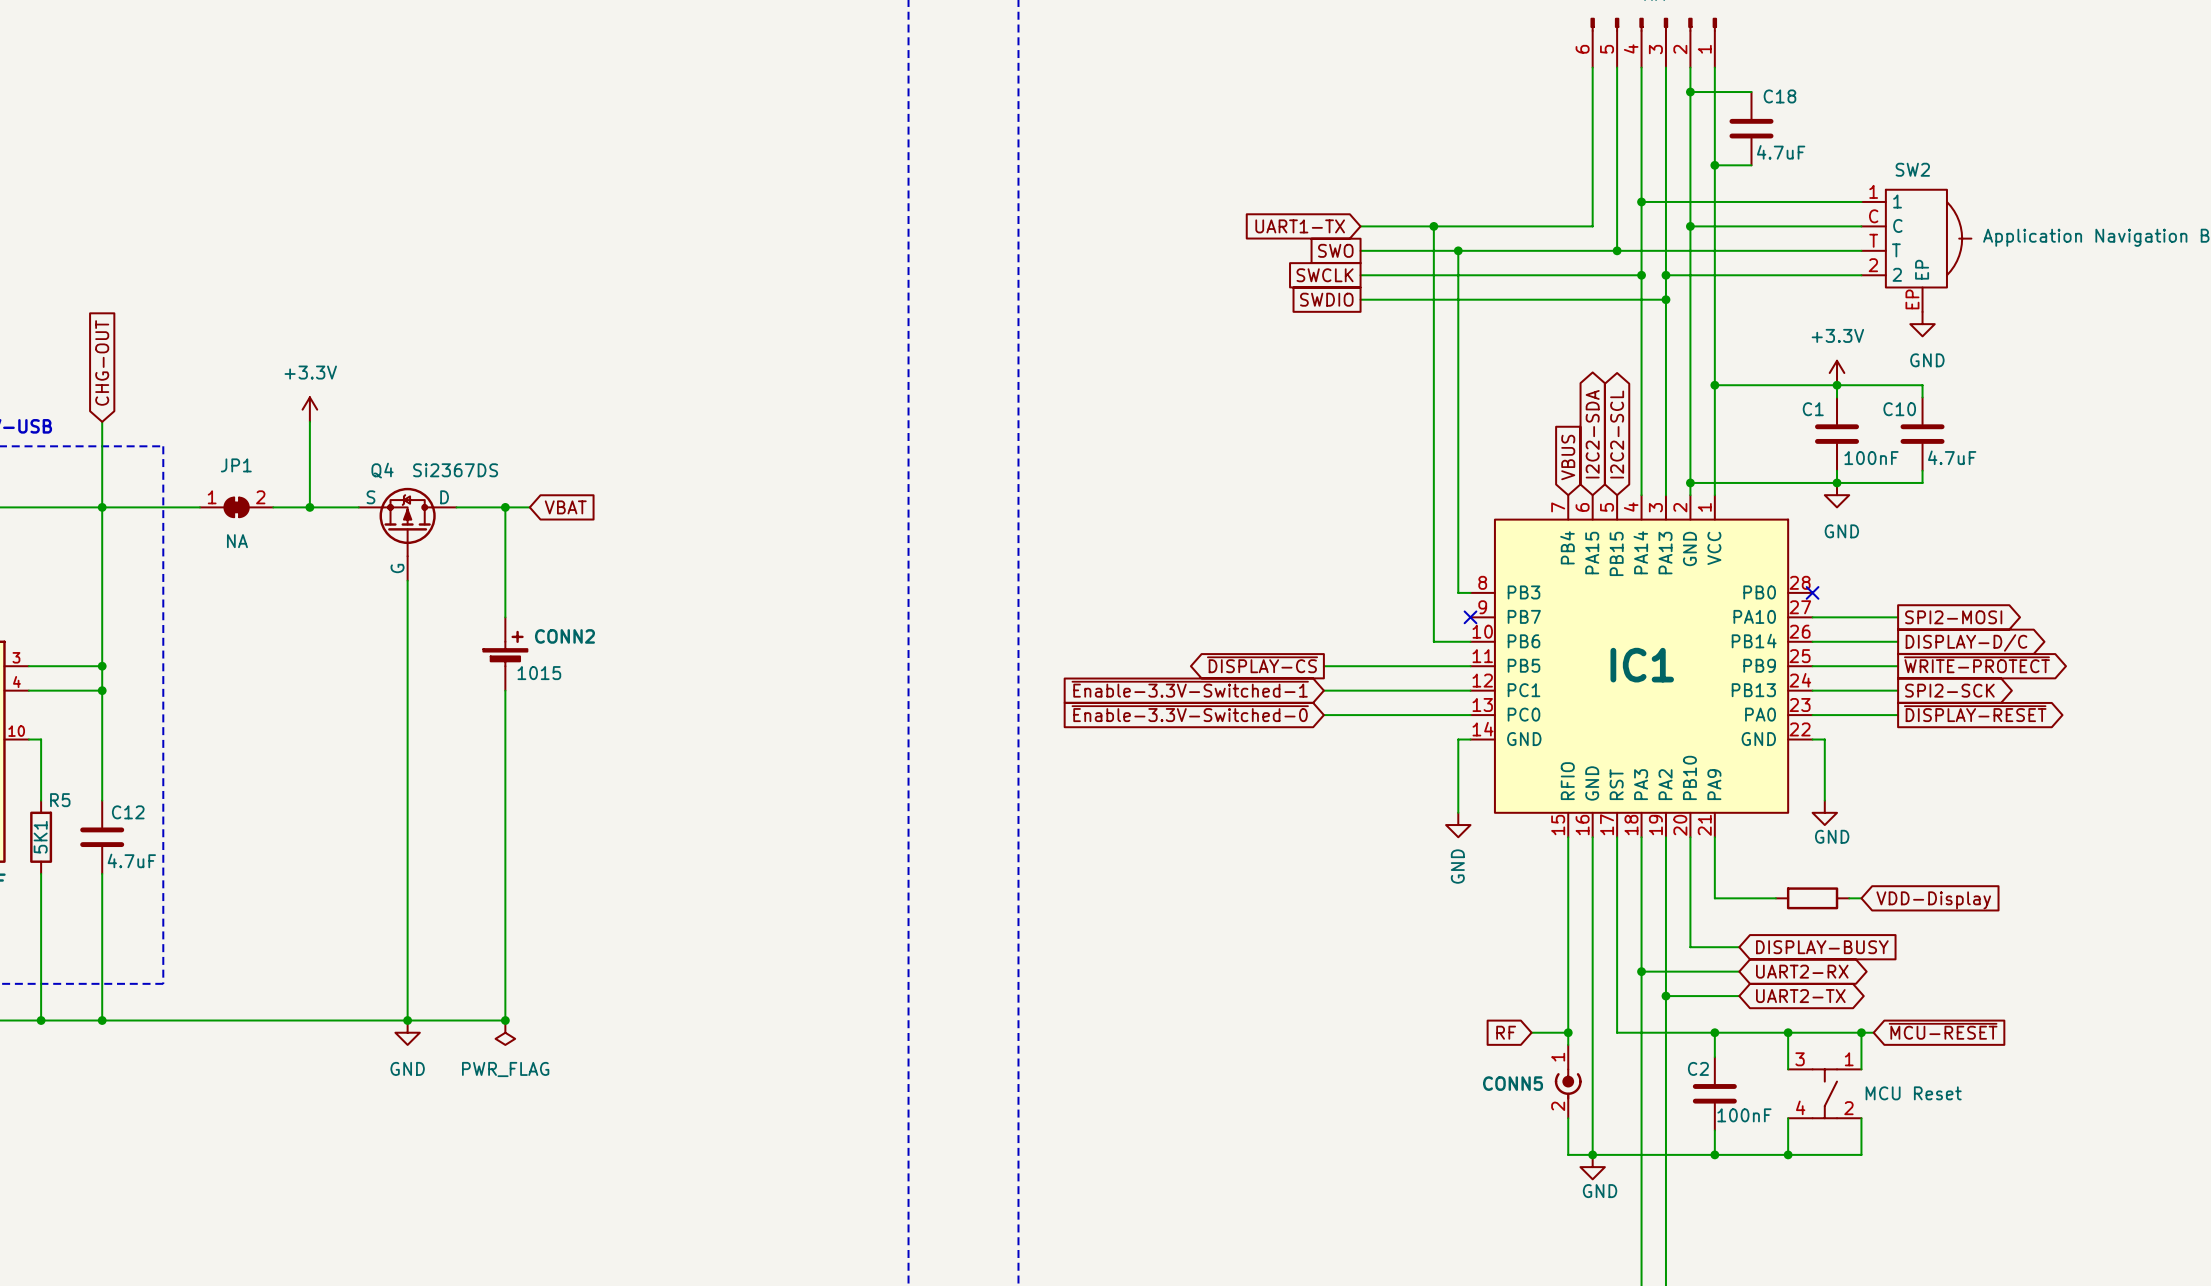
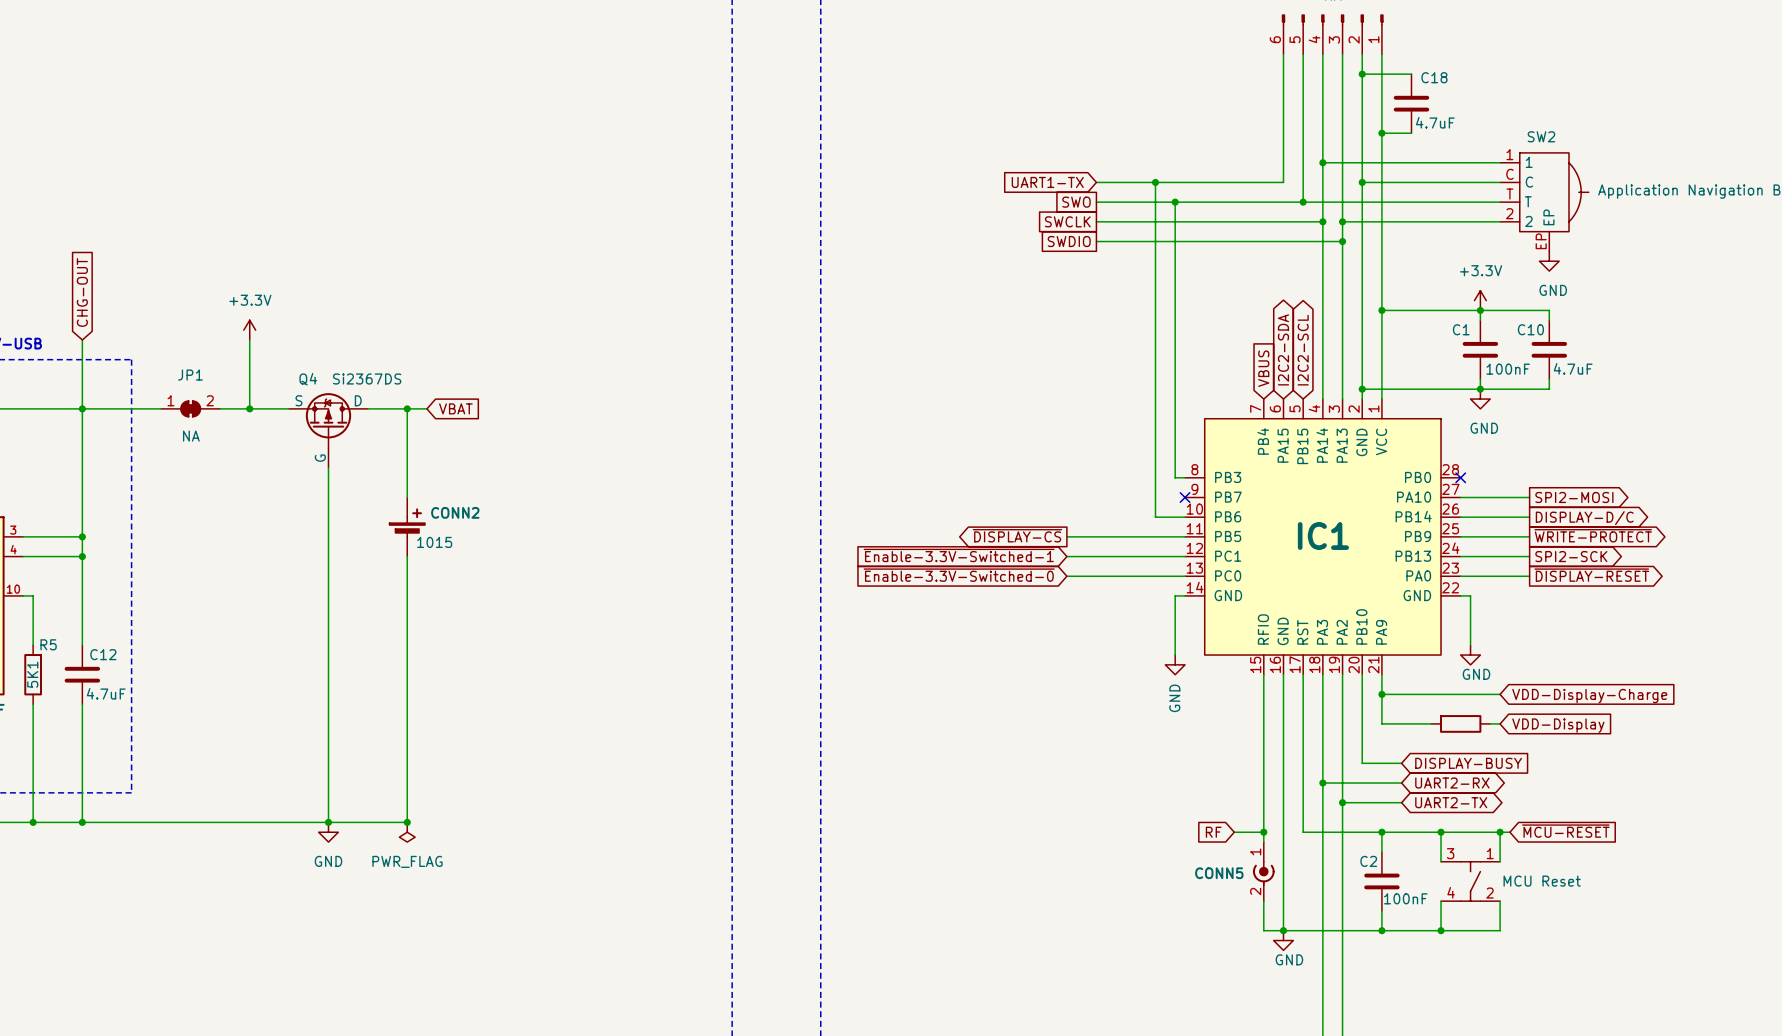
wire: none -> (1381, 694) (1500, 694)
junction: none -> (1381, 694)
global label: none -> VDD-Display-Charge (1589, 696)

